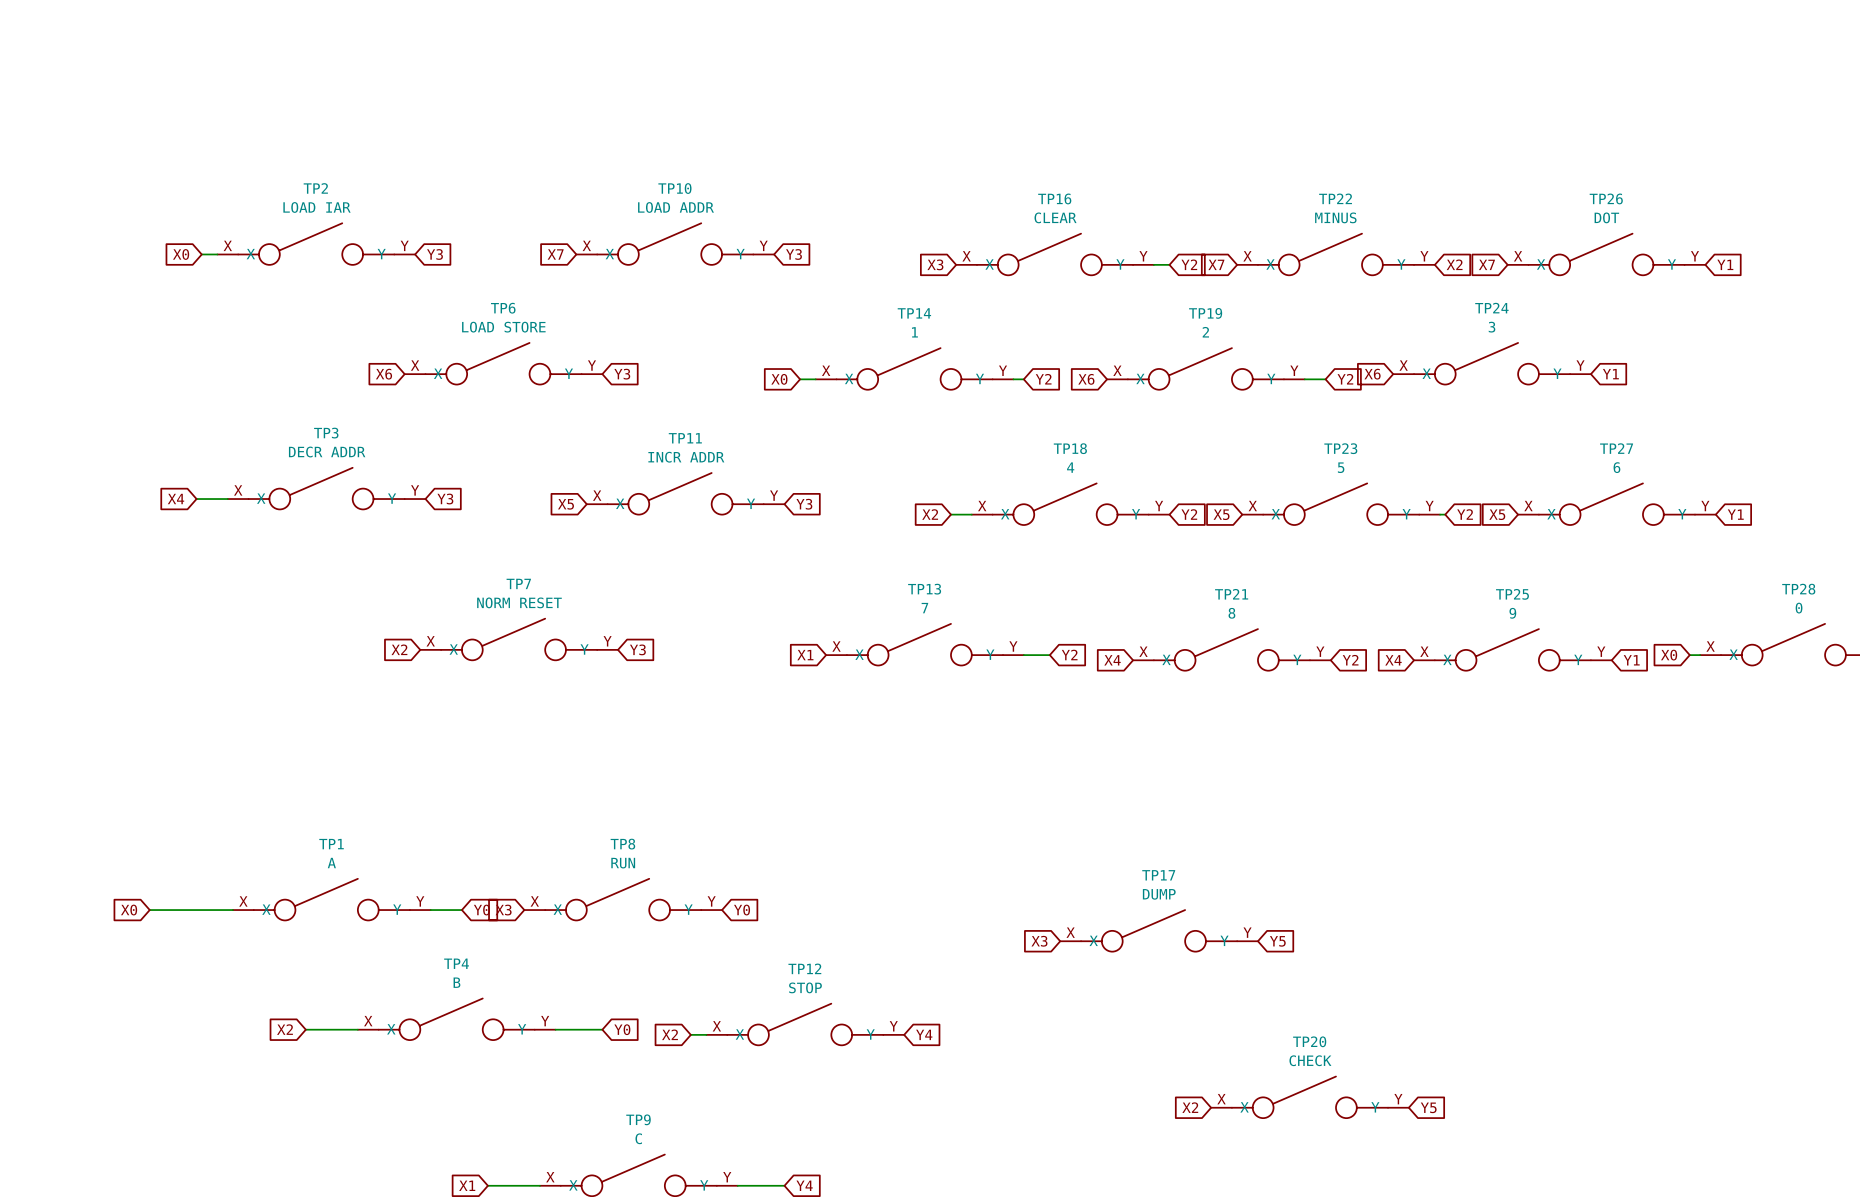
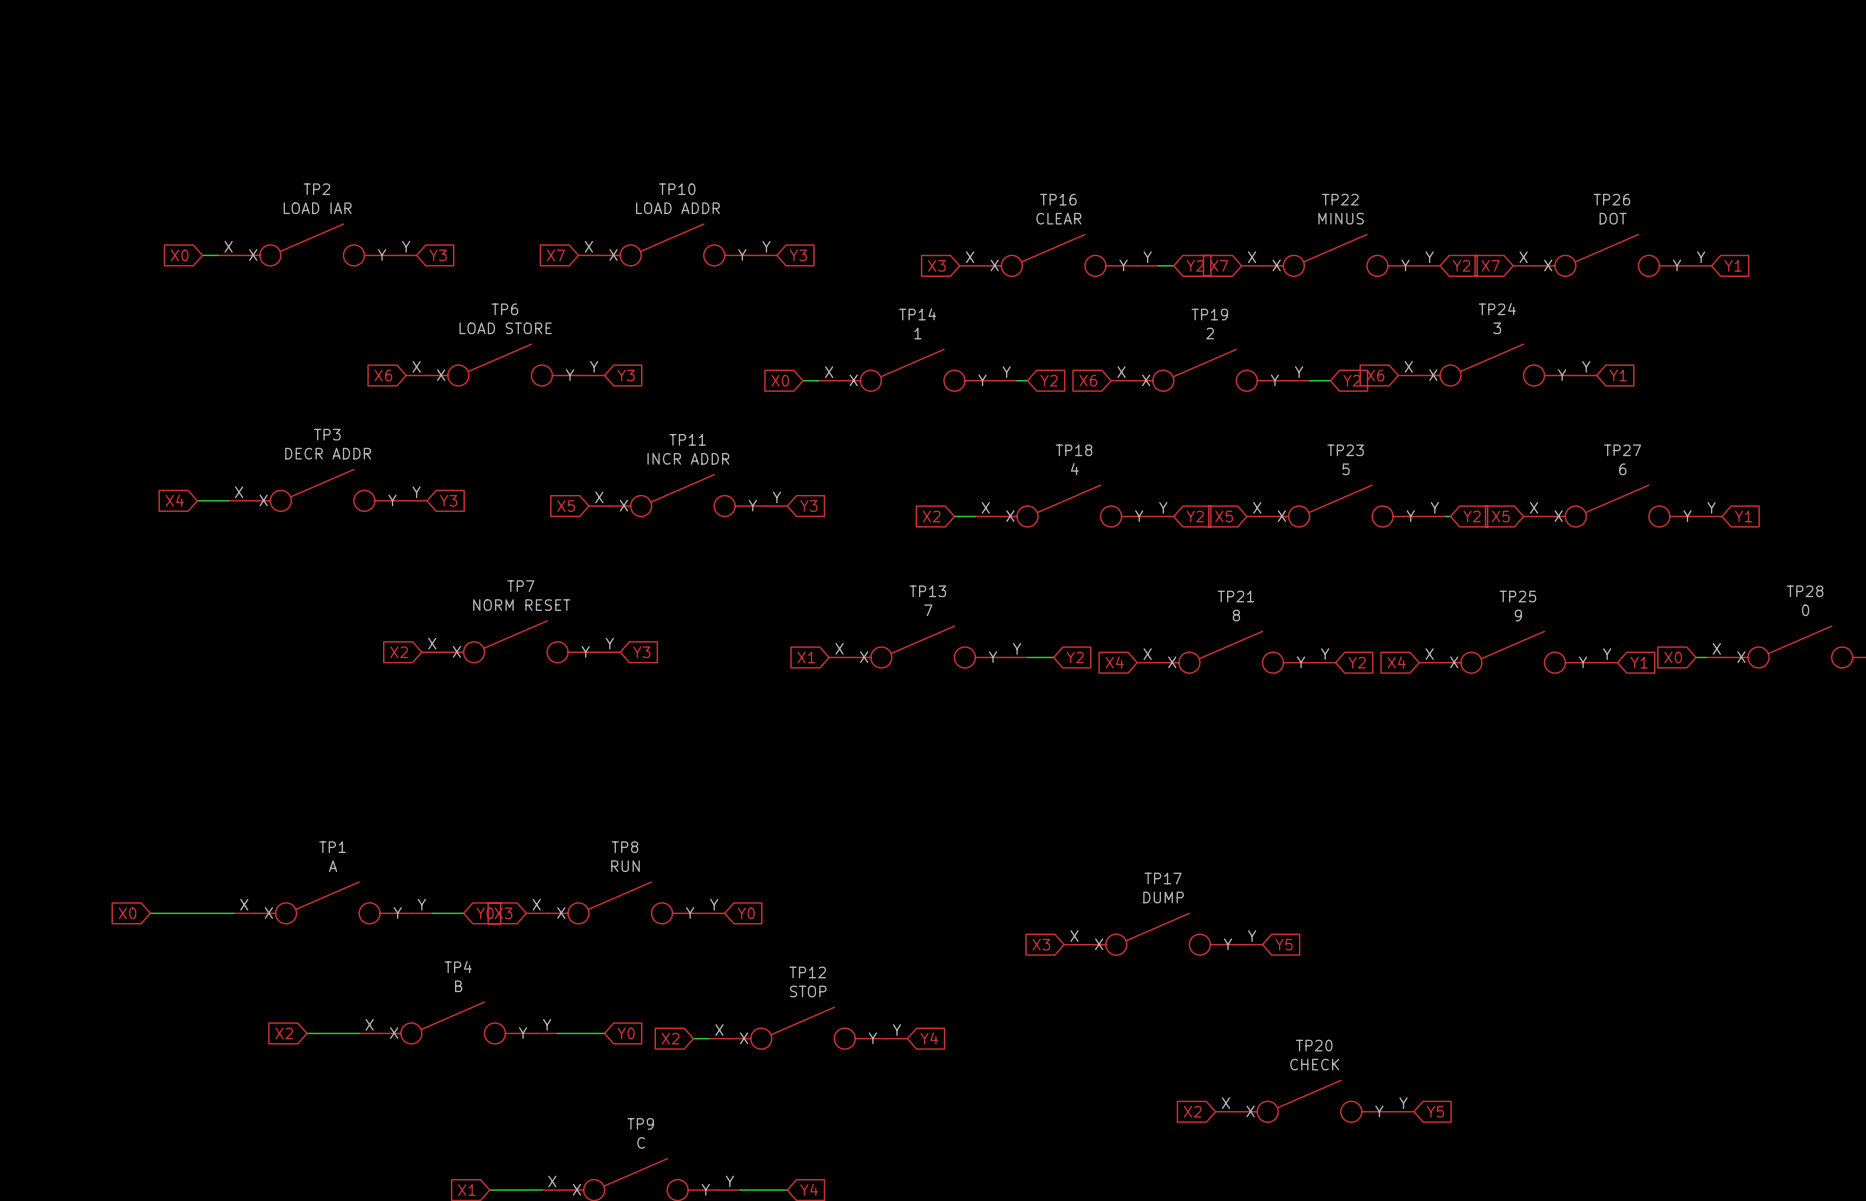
global label: X2 (1454, 264) -> Y2 (1461, 265)

